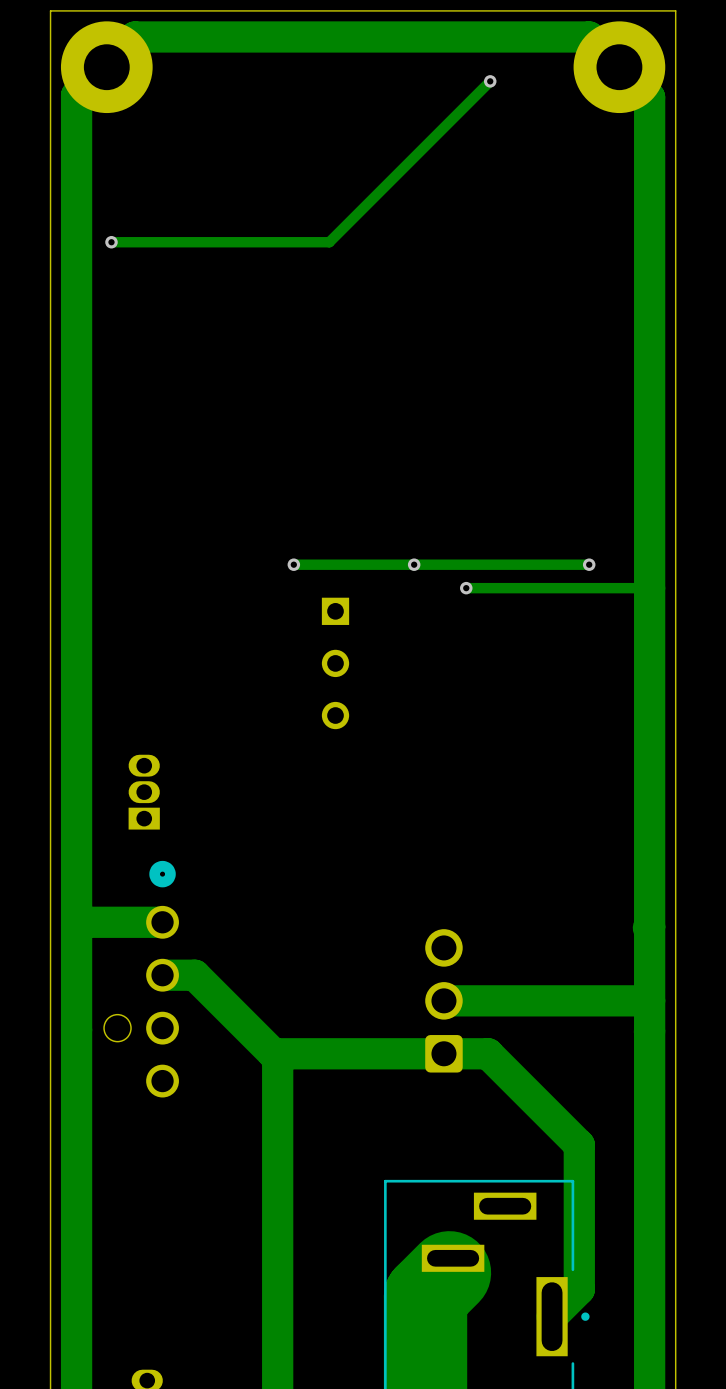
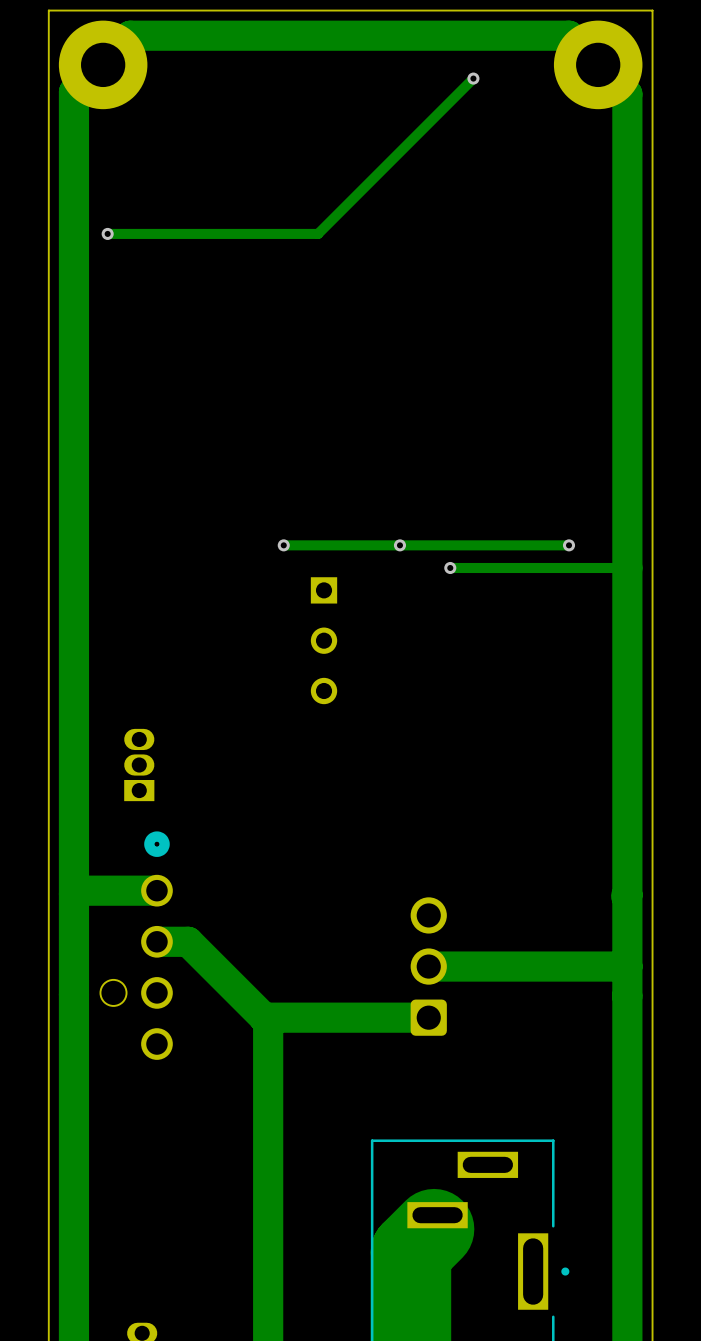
track: (443, 1053) (488, 1053) (579, 1145) (579, 1289) (552, 1316) -> none

